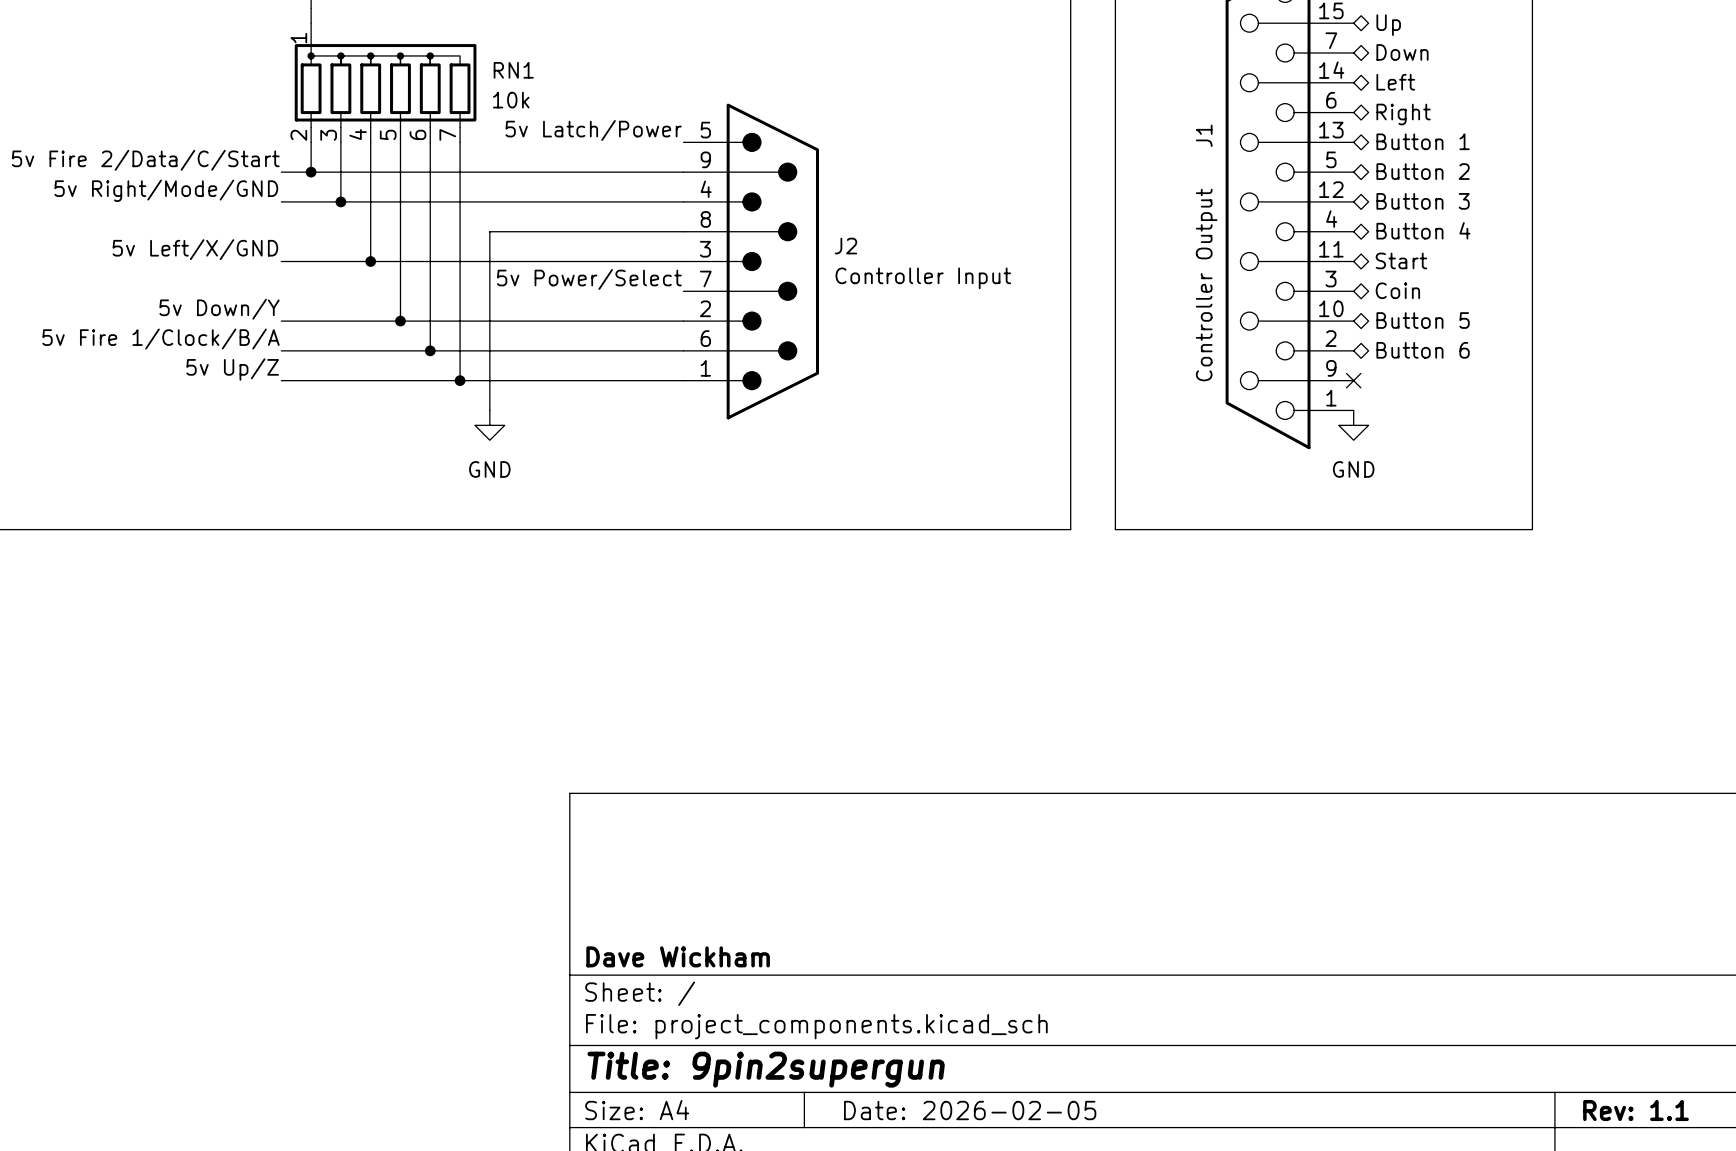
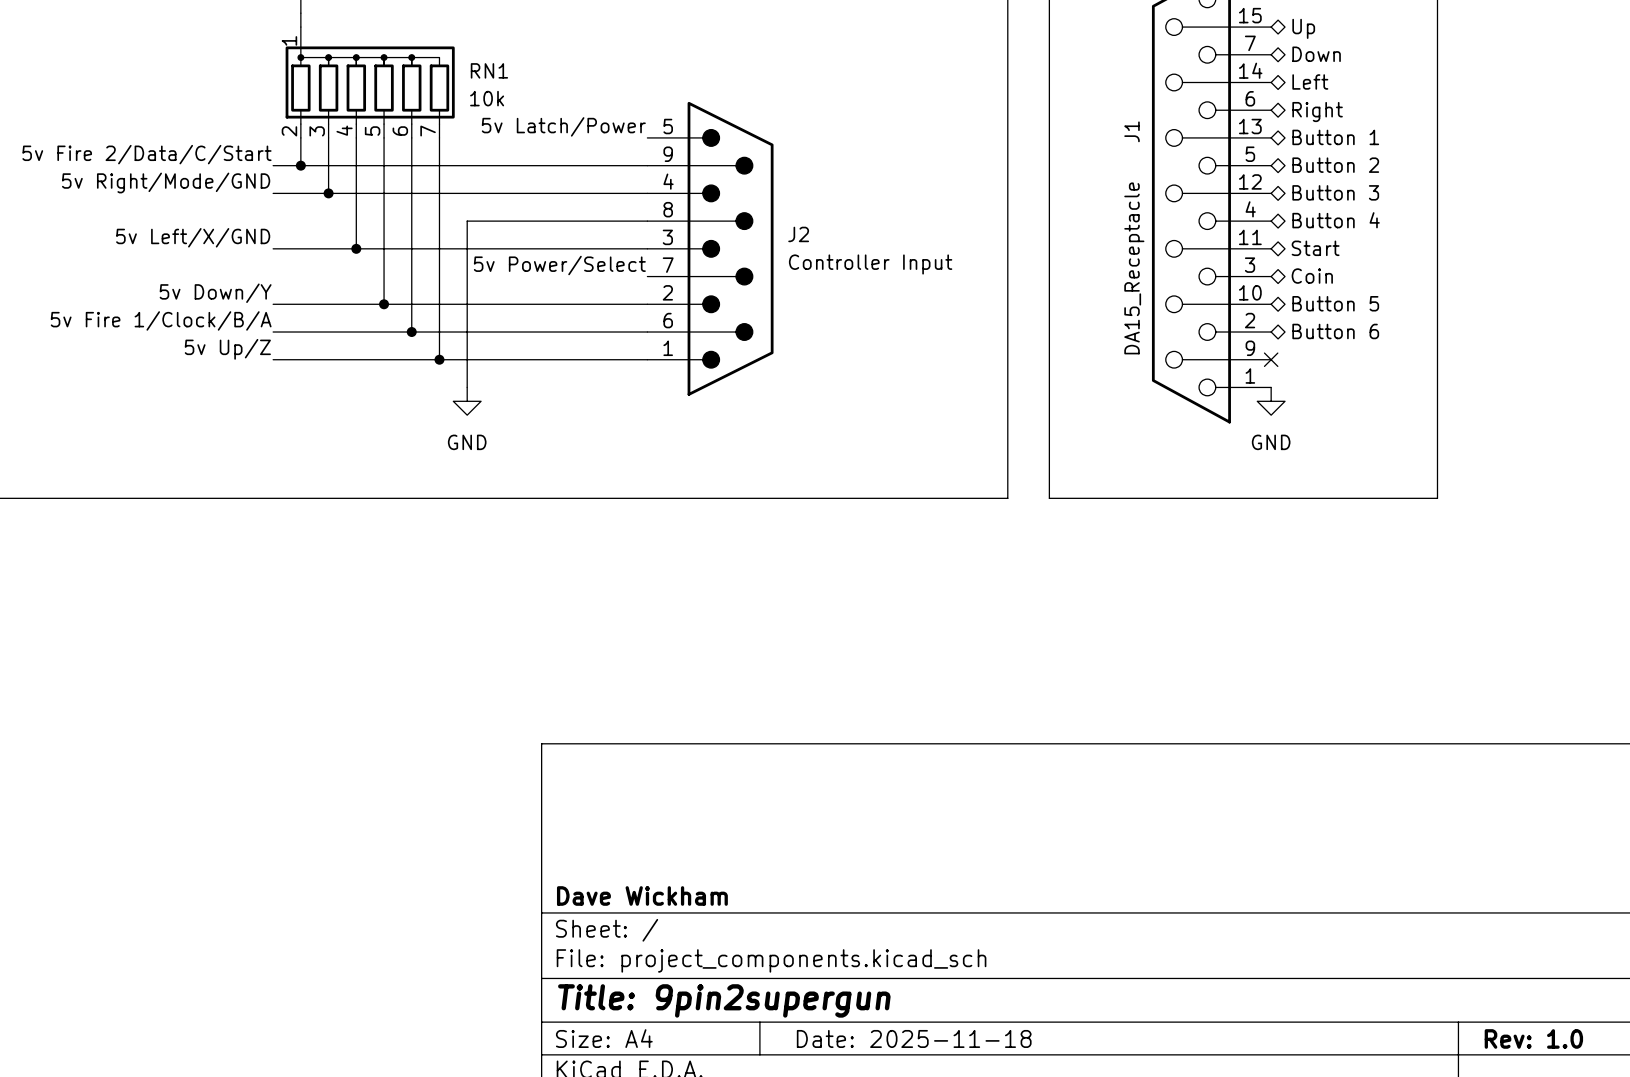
J1 value: Controller Output (1206, 285) -> DA15_Receptacle (1134, 268)
title block: Date: 2026-02-05 (970, 1110) -> Date: 2025-11-18 (914, 1038)
title block: Rev: 1.1 (1635, 1110) -> Rev: 1.0 (1533, 1038)

